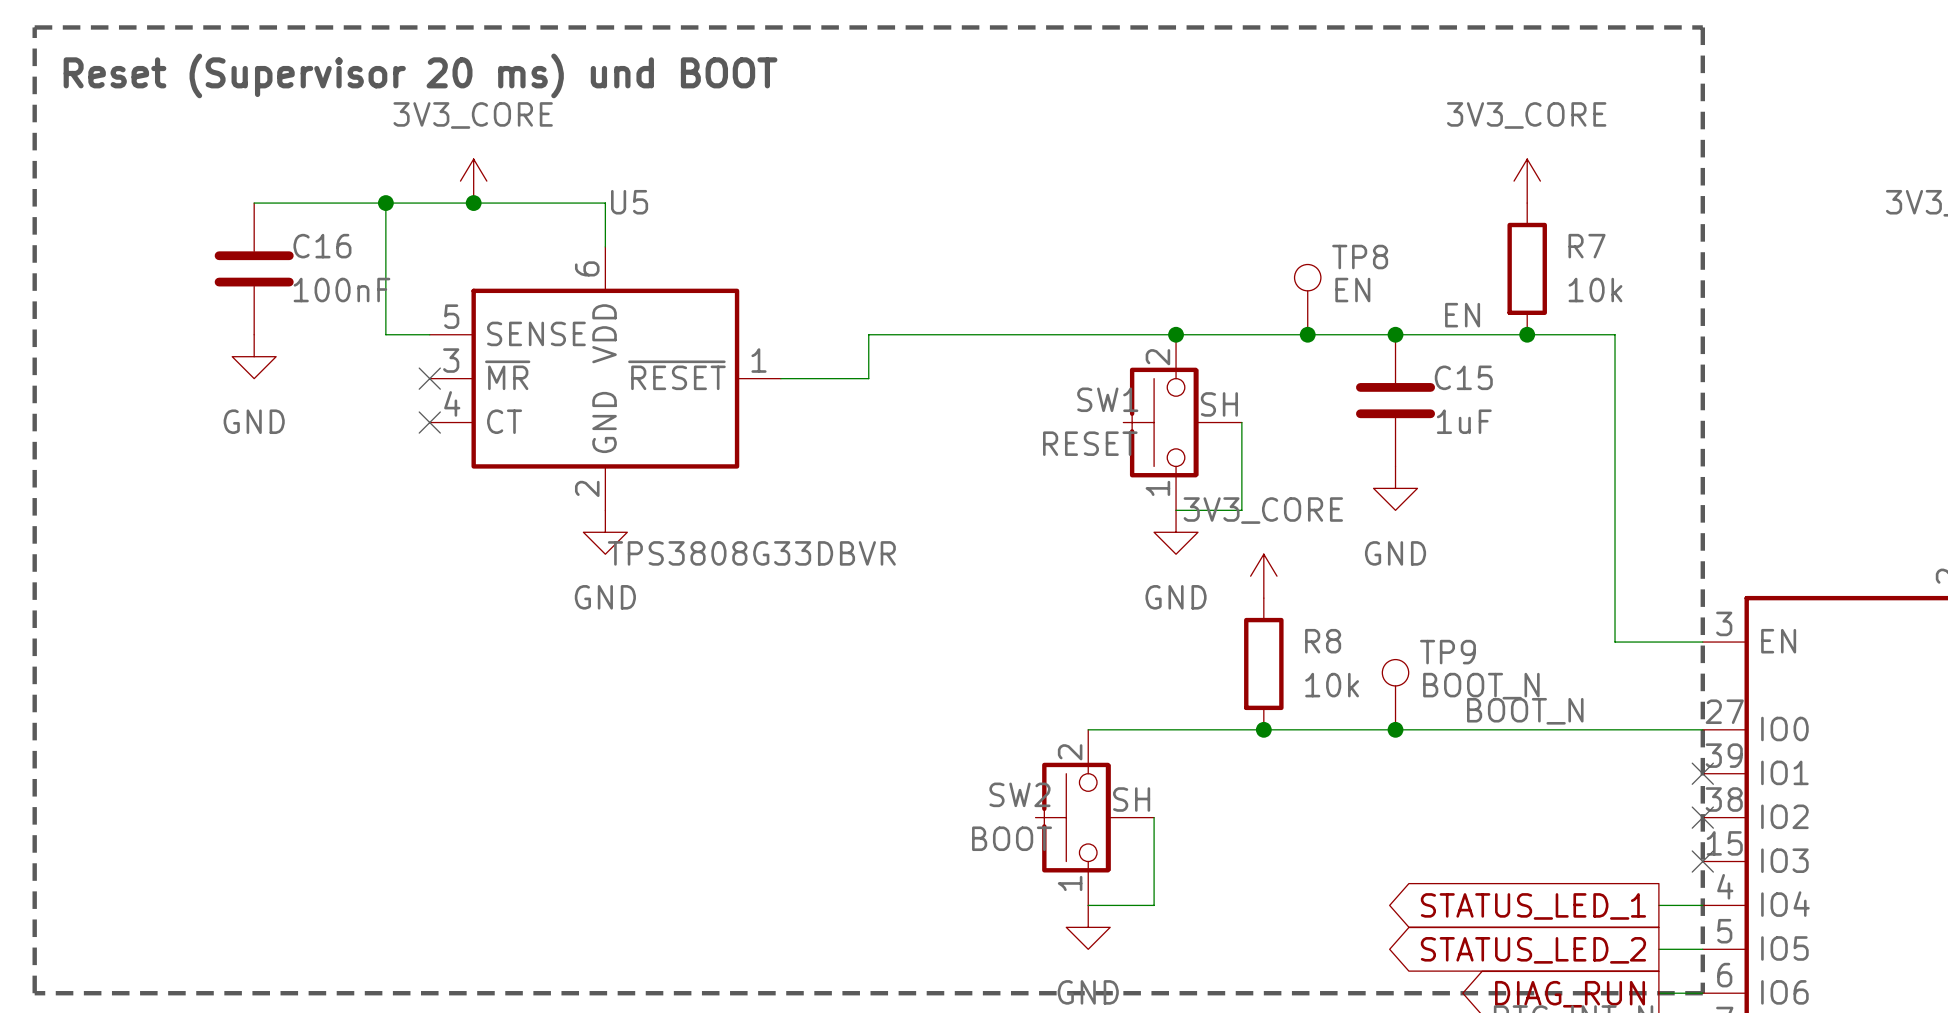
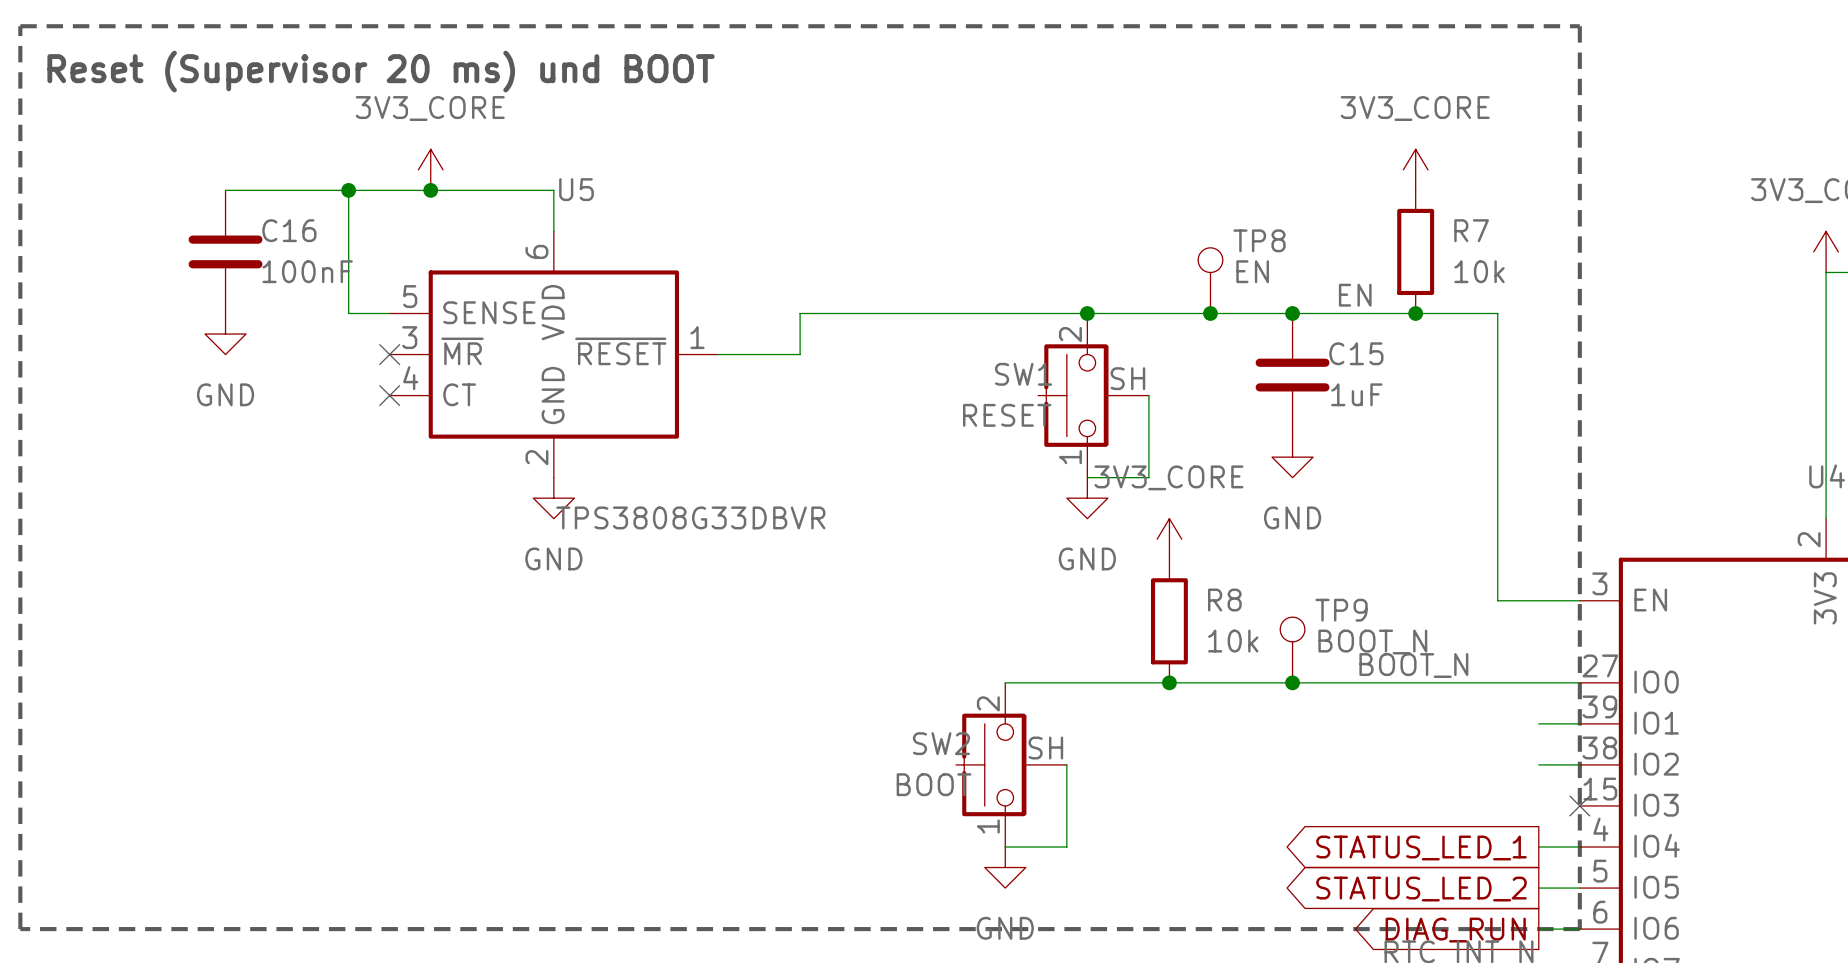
wire: none -> (1538, 723) (1579, 723)
no-connect mark: (1702, 773) -> none
wire: none -> (1538, 764) (1579, 764)
no-connect mark: (1702, 817) -> none

